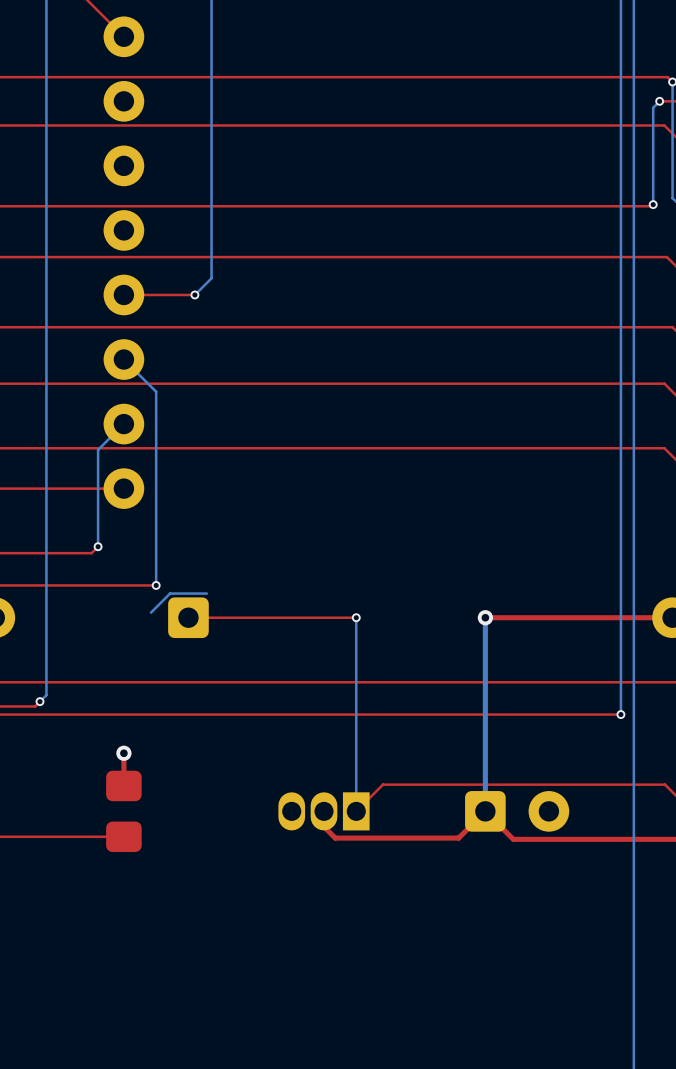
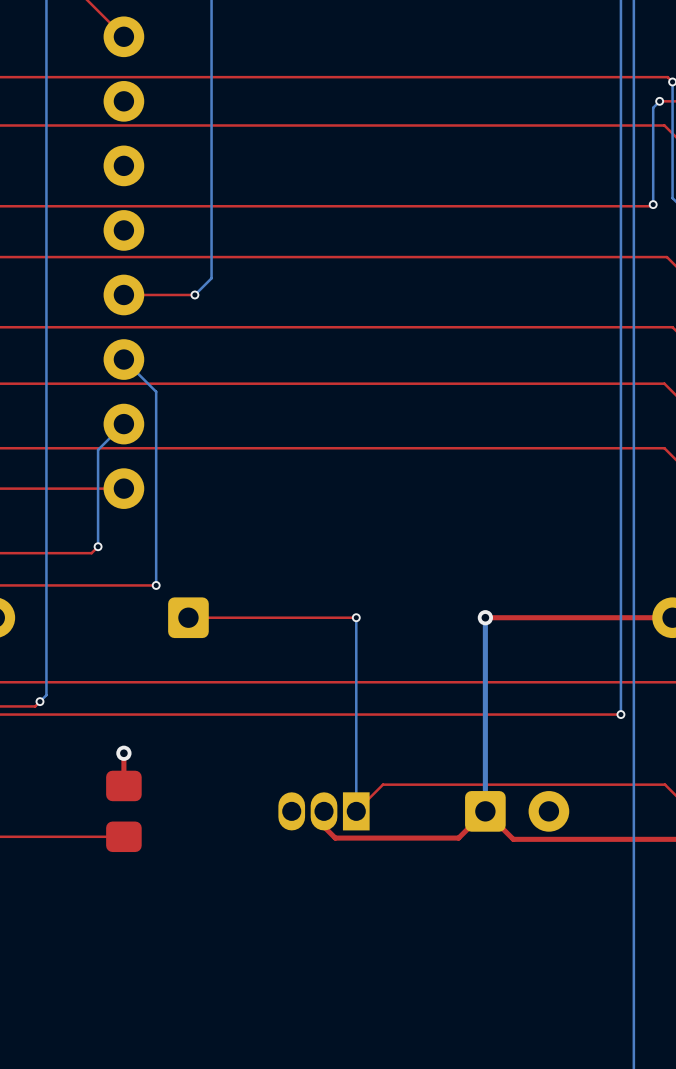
bottom track: (206, 593) (170, 593) (150, 612) -> none

